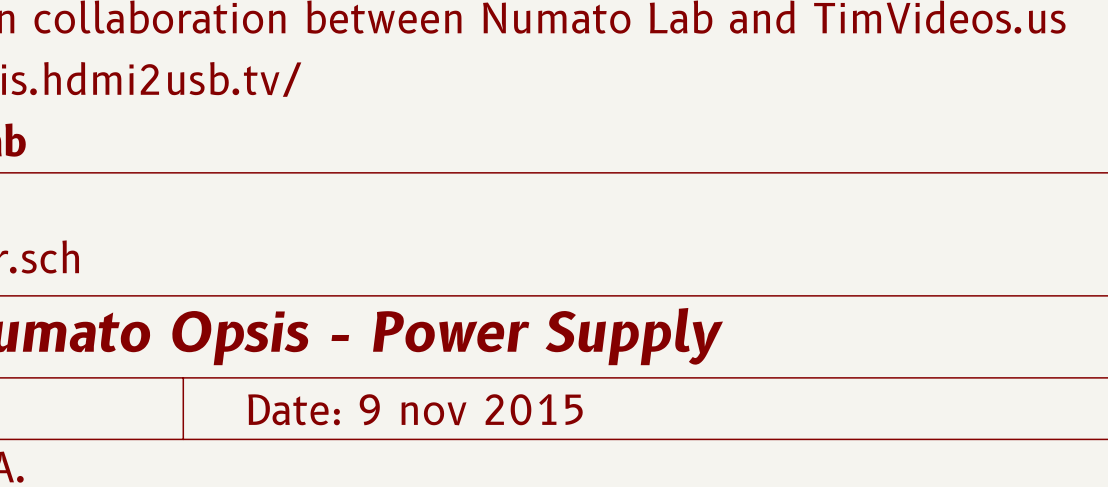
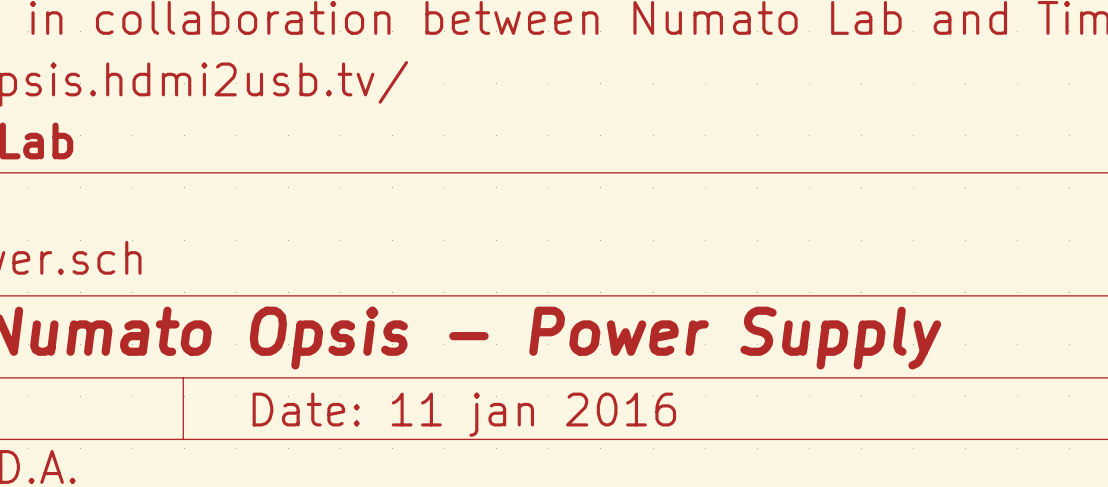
title block: Date: 9 nov 2015 (415, 409) -> Date: 11 jan 2016 (464, 414)

